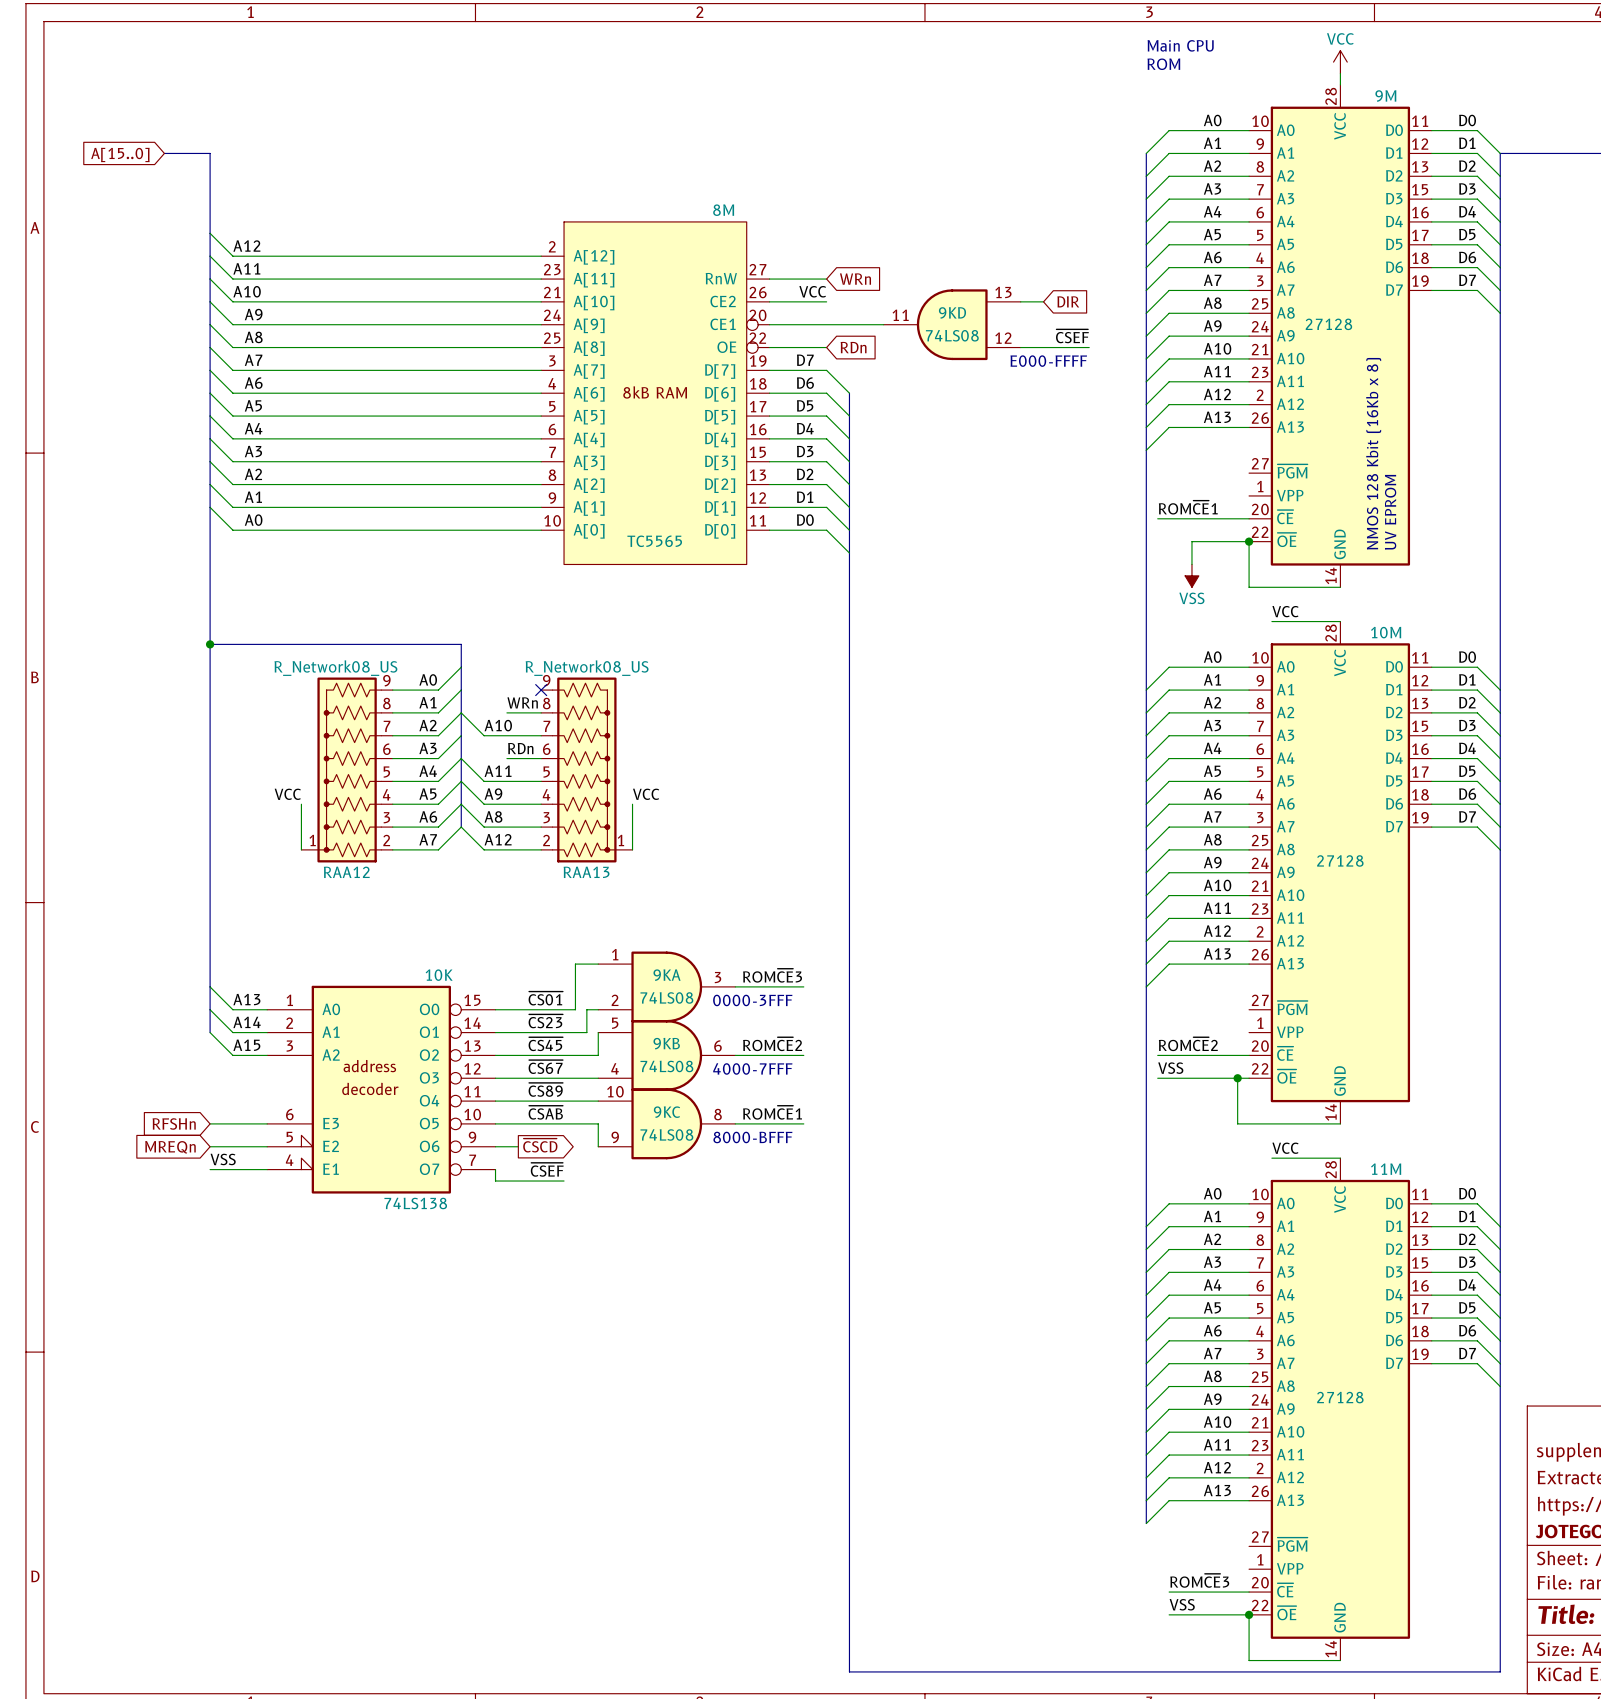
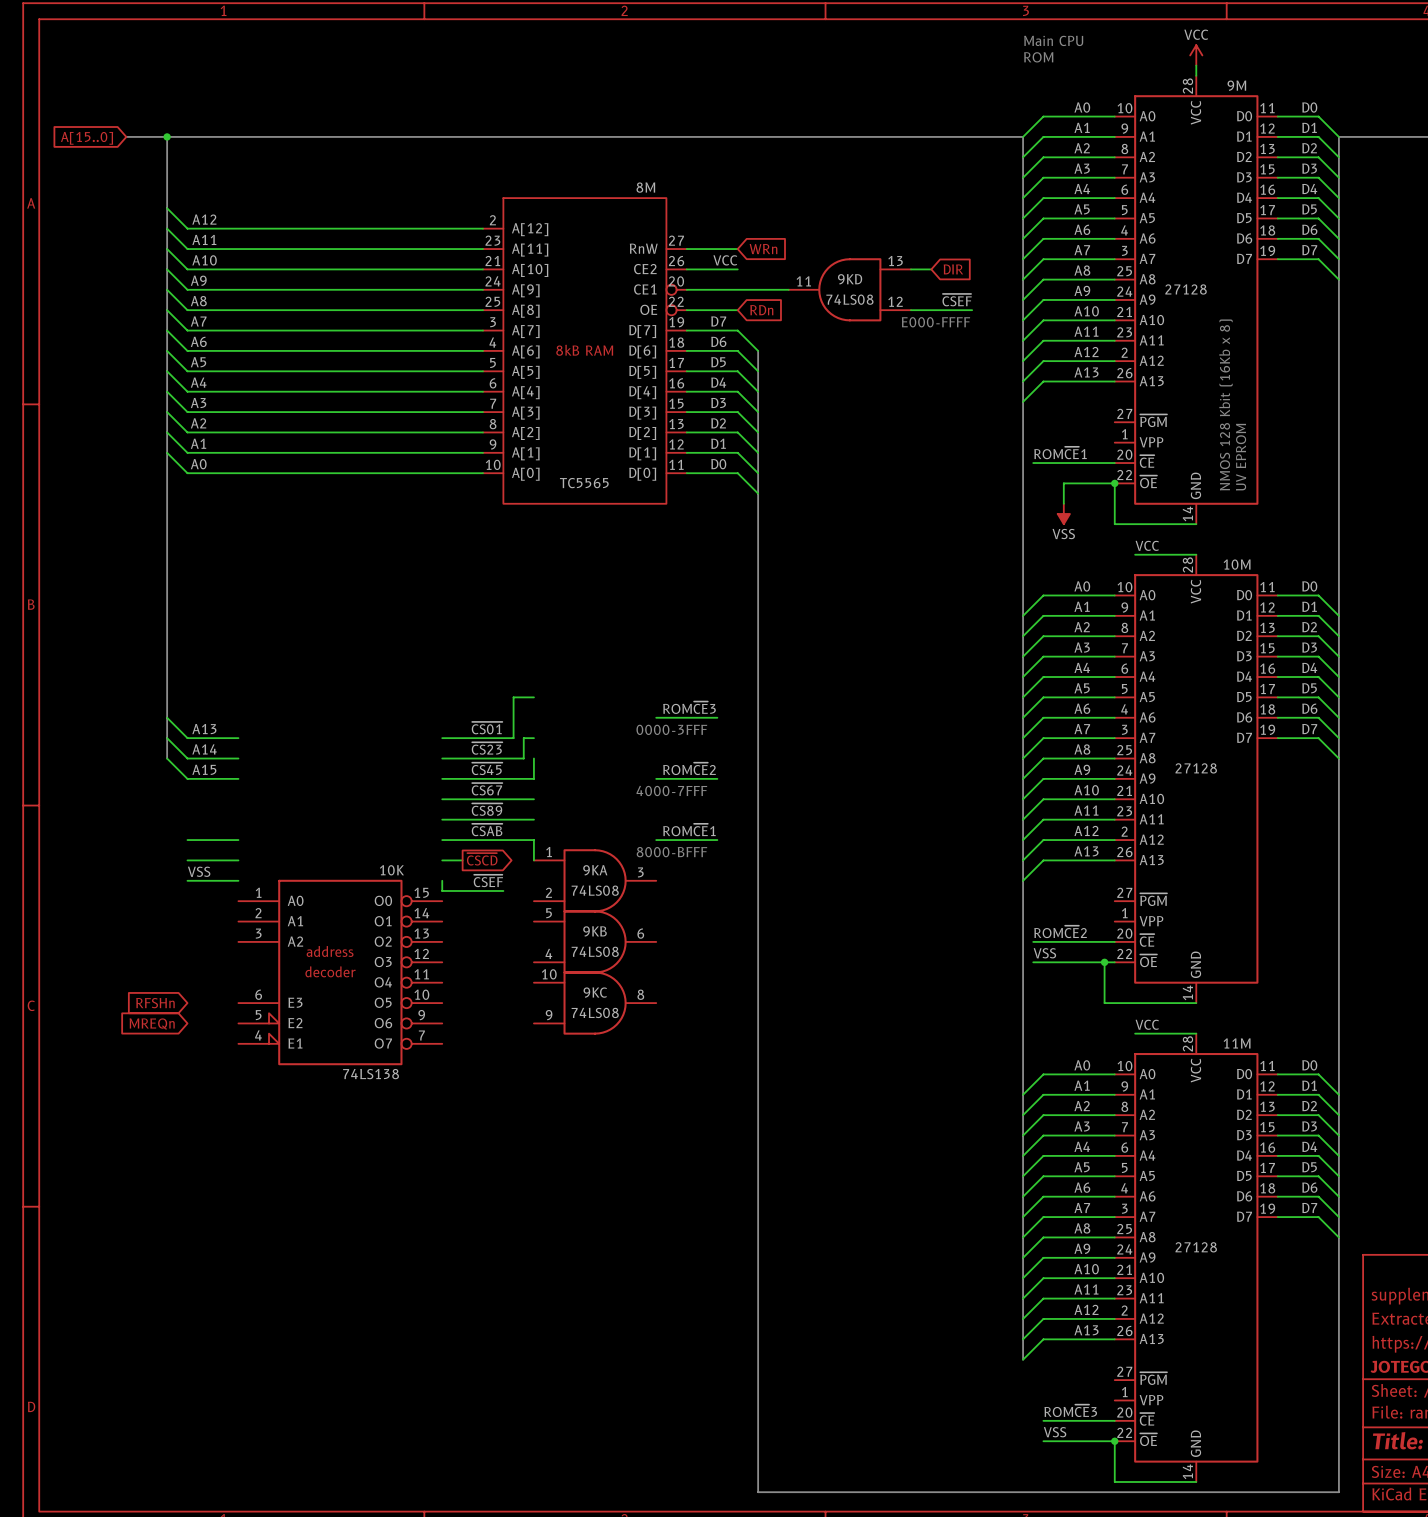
bus: none -> (126, 136) (146, 136)
bus: none -> (167, 136) (167, 758)
junction: none -> (167, 136)
bus: (210, 153) (210, 1032) -> (187, 136) (1023, 136)
global label position: A[15..0] (120, 154) -> A[15..0] (87, 138)
wire: (210, 233) (232, 256) -> (167, 208) (187, 228) (207, 228)
label position: A12 (246, 246) -> A12 (204, 219)
wire: (210, 256) (232, 279) -> (167, 228) (187, 249) (207, 249)
label position: A11 (246, 268) -> A11 (204, 239)
wire: (210, 279) (232, 301) -> (167, 249) (187, 269) (207, 269)
label position: A10 (247, 291) -> A10 (204, 260)
wire: (210, 301) (232, 324) -> (167, 269) (187, 289) (207, 289)
label position: A9 (253, 314) -> A9 (198, 280)
wire: (210, 324) (232, 347) -> (167, 289) (187, 310) (207, 310)
label position: A8 (253, 337) -> A8 (198, 301)
wire: (210, 347) (232, 370) -> (167, 310) (187, 330) (207, 330)
label position: A7 (253, 360) -> A7 (198, 321)
wire: (210, 370) (232, 393) -> (167, 330) (187, 350) (207, 350)
label position: A6 (253, 383) -> A6 (198, 341)
wire: (210, 393) (232, 416) -> (167, 350) (187, 371) (207, 371)
label position: A5 (253, 405) -> A5 (198, 362)
wire: (210, 416) (232, 438) -> (167, 371) (187, 391) (207, 391)
label position: A4 (253, 428) -> A4 (198, 382)
wire: (210, 438) (232, 461) -> (167, 391) (187, 412) (207, 412)
label position: A3 (253, 451) -> A3 (198, 402)
wire: (210, 461) (232, 484) -> (167, 412) (187, 432) (207, 432)
label position: A2 (253, 474) -> A2 (198, 423)
wire: (210, 484) (232, 507) -> (167, 432) (187, 452) (207, 452)
label position: A1 (253, 497) -> A1 (198, 443)
wire: (210, 507) (232, 530) -> (167, 452) (187, 473) (207, 473)
label position: A0 (253, 520) -> A0 (198, 464)
bus: (210, 644) (461, 644) (461, 827) -> none
junction: (210, 644) -> none
wire: (461, 667) (438, 690) (392, 690) -> none
label: A0 (428, 679) -> none
wire: (461, 690) (438, 712) (392, 712) -> none
no-connect mark: (541, 690) -> none
label: A1 (427, 702) -> none
label: WRn (522, 702) -> none
wire: (506, 712) (541, 712) -> none
label: A2 (427, 725) -> none
label: A10 (498, 725) -> none
wire: (392, 735) (438, 735) (461, 712) (484, 735) (541, 735) -> none
wire: (461, 735) (438, 758) (392, 758) -> none
label: A3 (427, 748) -> none
label: RDn (520, 748) -> none
wire: (506, 758) (541, 758) -> none
RAA12: R_Network08_US (347, 769) -> none
RAA13: R_Network08_US (586, 769) -> none
label: A4 (428, 771) -> none
label: A11 (498, 771) -> none
wire: (392, 781) (438, 781) (461, 758) (484, 781) (541, 781) -> none
label: VCC (287, 794) -> none
label: A5 (427, 794) -> none
label: A9 (493, 794) -> none
label: VCC (646, 794) -> none
wire: none -> (167, 717) (187, 738) (238, 738)
wire: (301, 804) (301, 849) -> none
wire: (392, 804) (438, 804) (461, 781) (484, 804) (541, 804) -> none
wire: (632, 804) (632, 849) -> none
label: A6 (428, 816) -> none
label: A8 (493, 816) -> none
wire: none -> (167, 738) (187, 758) (238, 758)
wire: (392, 827) (438, 827) (461, 804) (484, 827) (495, 827) -> none
label: A7 (428, 839) -> none
label: A12 (498, 839) -> none
wire: none -> (167, 758) (187, 778) (238, 778)
wire: (392, 849) (438, 849) (461, 827) (484, 849) (495, 849) -> none
wire: (598, 964) (575, 964) (575, 1009) (495, 1009) -> (533, 860) (533, 840) (442, 840)
label position: ROM~{CE}3 (772, 975) -> ROM~{CE}3 (689, 707)
wire: (210, 986) (232, 1009) (267, 1009) -> (187, 880) (238, 880)
wire: (735, 986) (803, 986) -> (656, 717) (717, 717)
label position: ~{CS01} (545, 998) -> ~{CS01} (487, 728)
label position: A13 (246, 999) -> A13 (204, 729)
text position: 0000-3FFF (752, 1000) -> 0000-3FFF (671, 729)
wire: (210, 1009) (232, 1032) (267, 1032) -> none
wire: (598, 1009) (586, 1009) (586, 1032) (495, 1032) -> none
label position: ~{CS23} (545, 1021) -> ~{CS23} (487, 748)
label position: A14 (247, 1022) -> A14 (204, 749)
wire: (210, 1032) (232, 1055) (267, 1055) -> none
wire: (598, 1032) (598, 1055) (495, 1055) -> (533, 758) (533, 778) (442, 778)
label position: ~{CS45} (545, 1044) -> ~{CS45} (487, 768)
label position: ROM~{CE}2 (772, 1044) -> ROM~{CE}2 (689, 768)
label position: A15 (246, 1045) -> A15 (204, 769)
wire: (735, 1055) (803, 1055) -> (656, 778) (717, 778)
label position: ~{CS67} (545, 1067) -> ~{CS67} (487, 789)
text position: 4000-7FFF (752, 1068) -> 4000-7FFF (671, 790)
wire: (495, 1078) (598, 1078) -> (442, 799) (533, 799)
label position: ~{CS89} (545, 1089) -> ~{CS89} (487, 809)
wire: (495, 1101) (598, 1101) -> (442, 819) (533, 819)
label position: ~{CSAB} (545, 1112) -> ~{CSAB} (487, 830)
label position: ROM~{CE}1 (772, 1112) -> ROM~{CE}1 (689, 830)
wire: (210, 1123) (267, 1123) -> (187, 840) (238, 840)
wire: (495, 1123) (598, 1123) (598, 1146) -> none
wire: (735, 1123) (803, 1123) -> (656, 840) (717, 840)
text position: 8000-BFFF (752, 1137) -> 8000-BFFF (671, 852)
global label position: ~{CSCD} (540, 1145) -> ~{CSCD} (482, 859)
wire: (210, 1146) (267, 1146) -> (187, 860) (238, 860)
wire: (495, 1146) (518, 1146) -> (442, 860) (462, 860)
label position: VSS (223, 1159) -> VSS (199, 871)
wire: (210, 1169) (267, 1169) -> none
wire: (495, 1169) (495, 1181) (564, 1181) -> (442, 880) (442, 890) (503, 890)
label position: ~{CSEF} (547, 1169) -> ~{CSEF} (488, 880)

